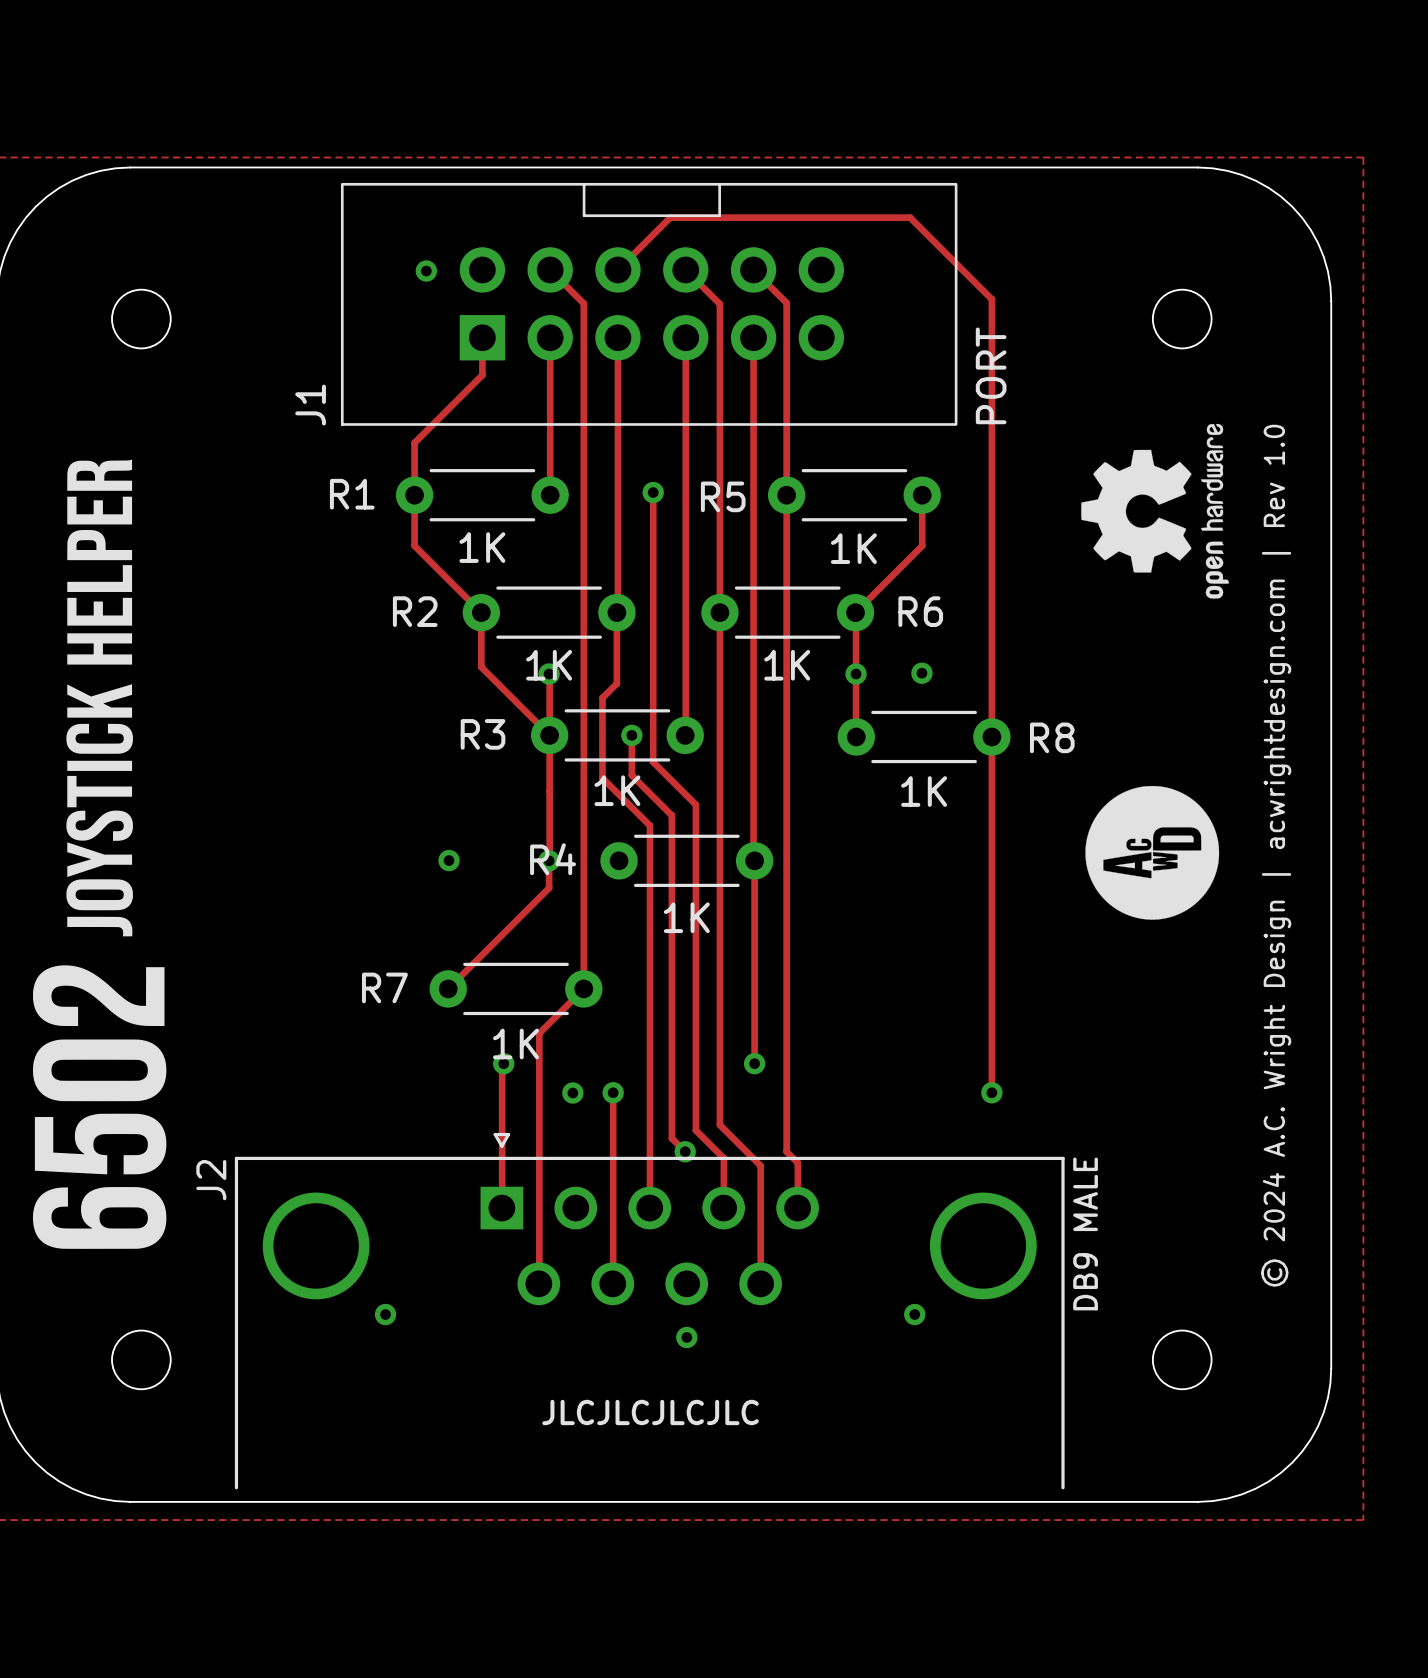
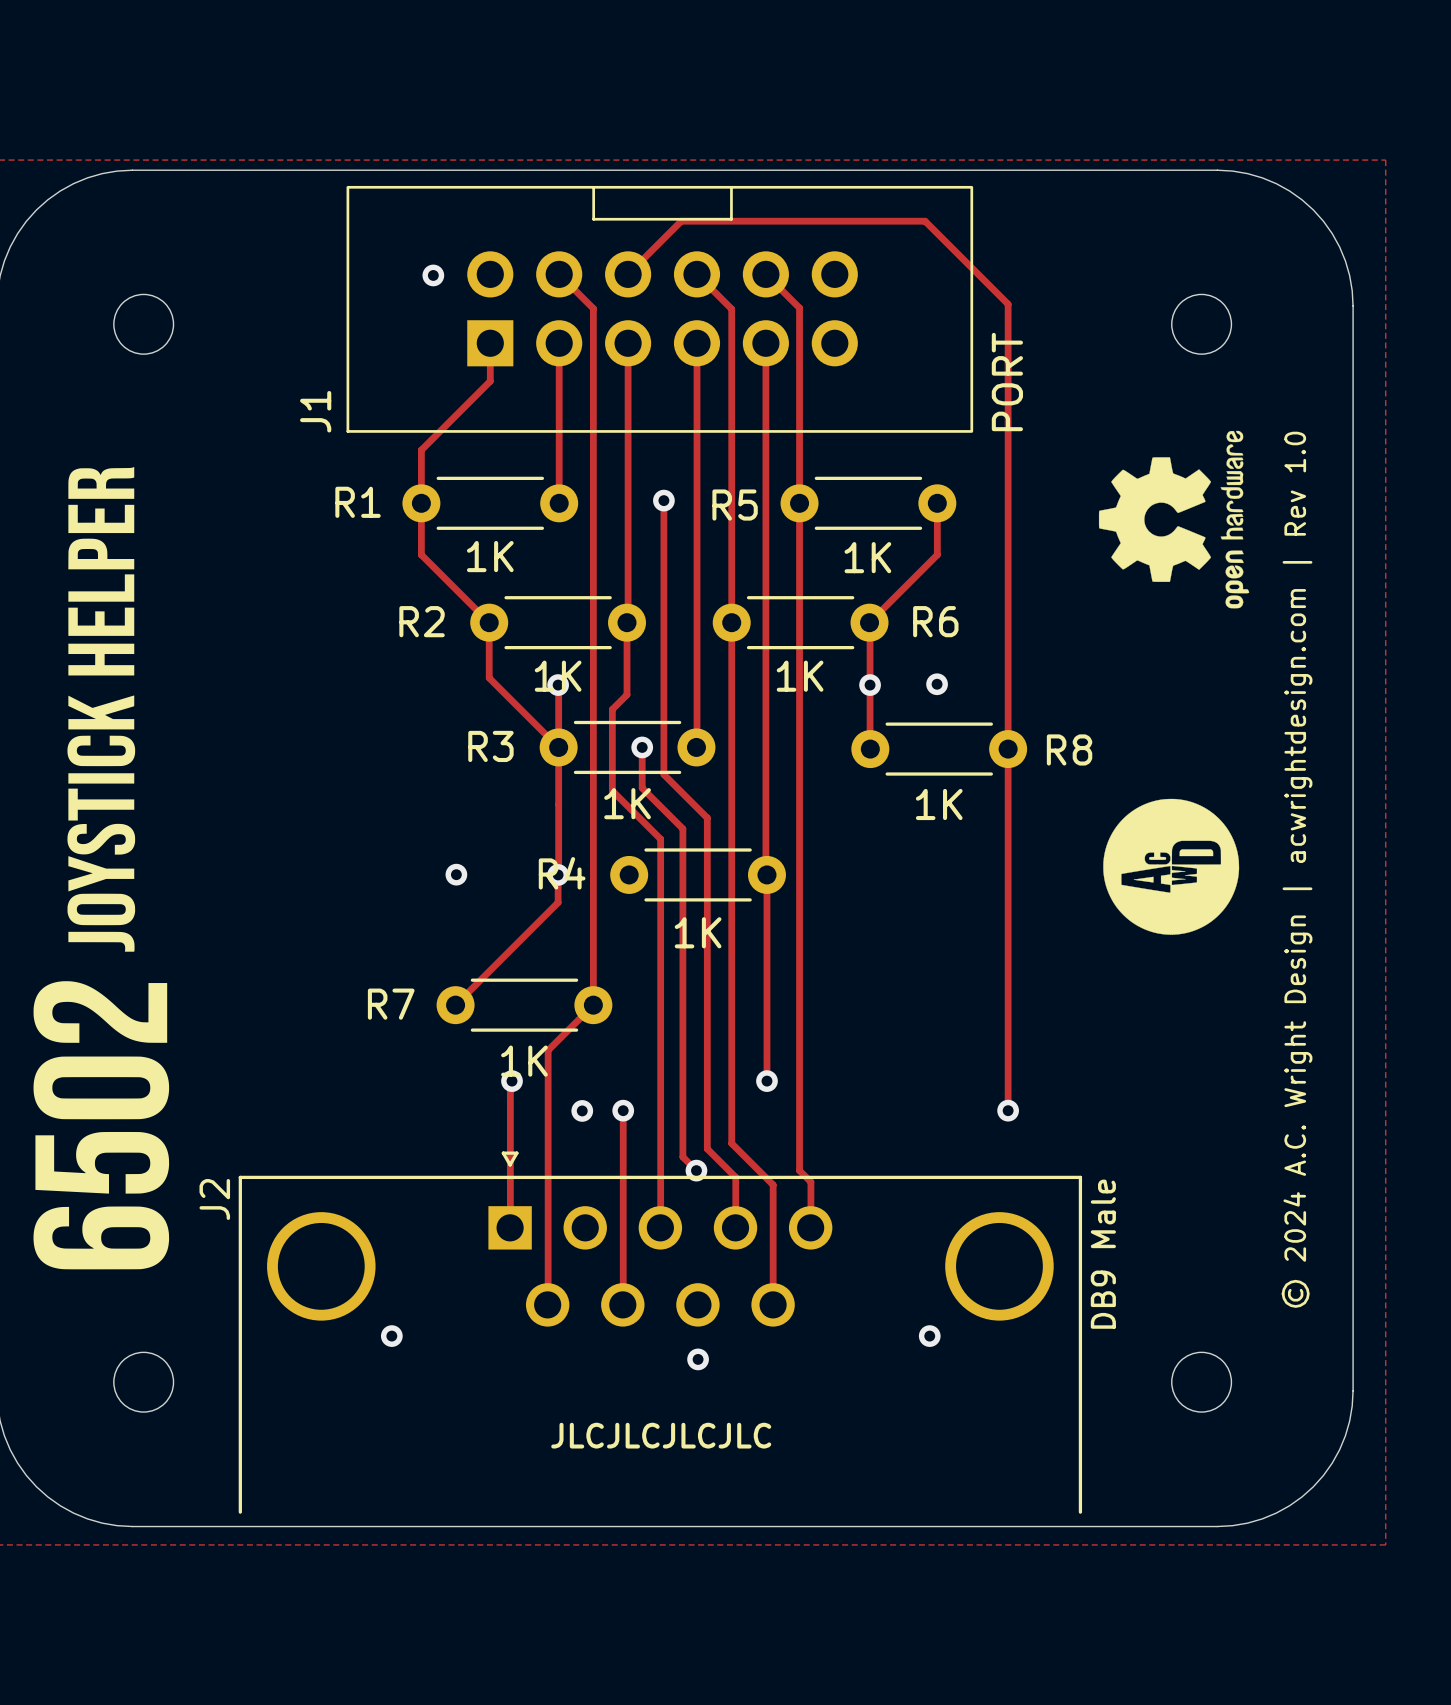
J2 value: DB9 MALE (1085, 1233) -> DB9 Male (1103, 1254)

